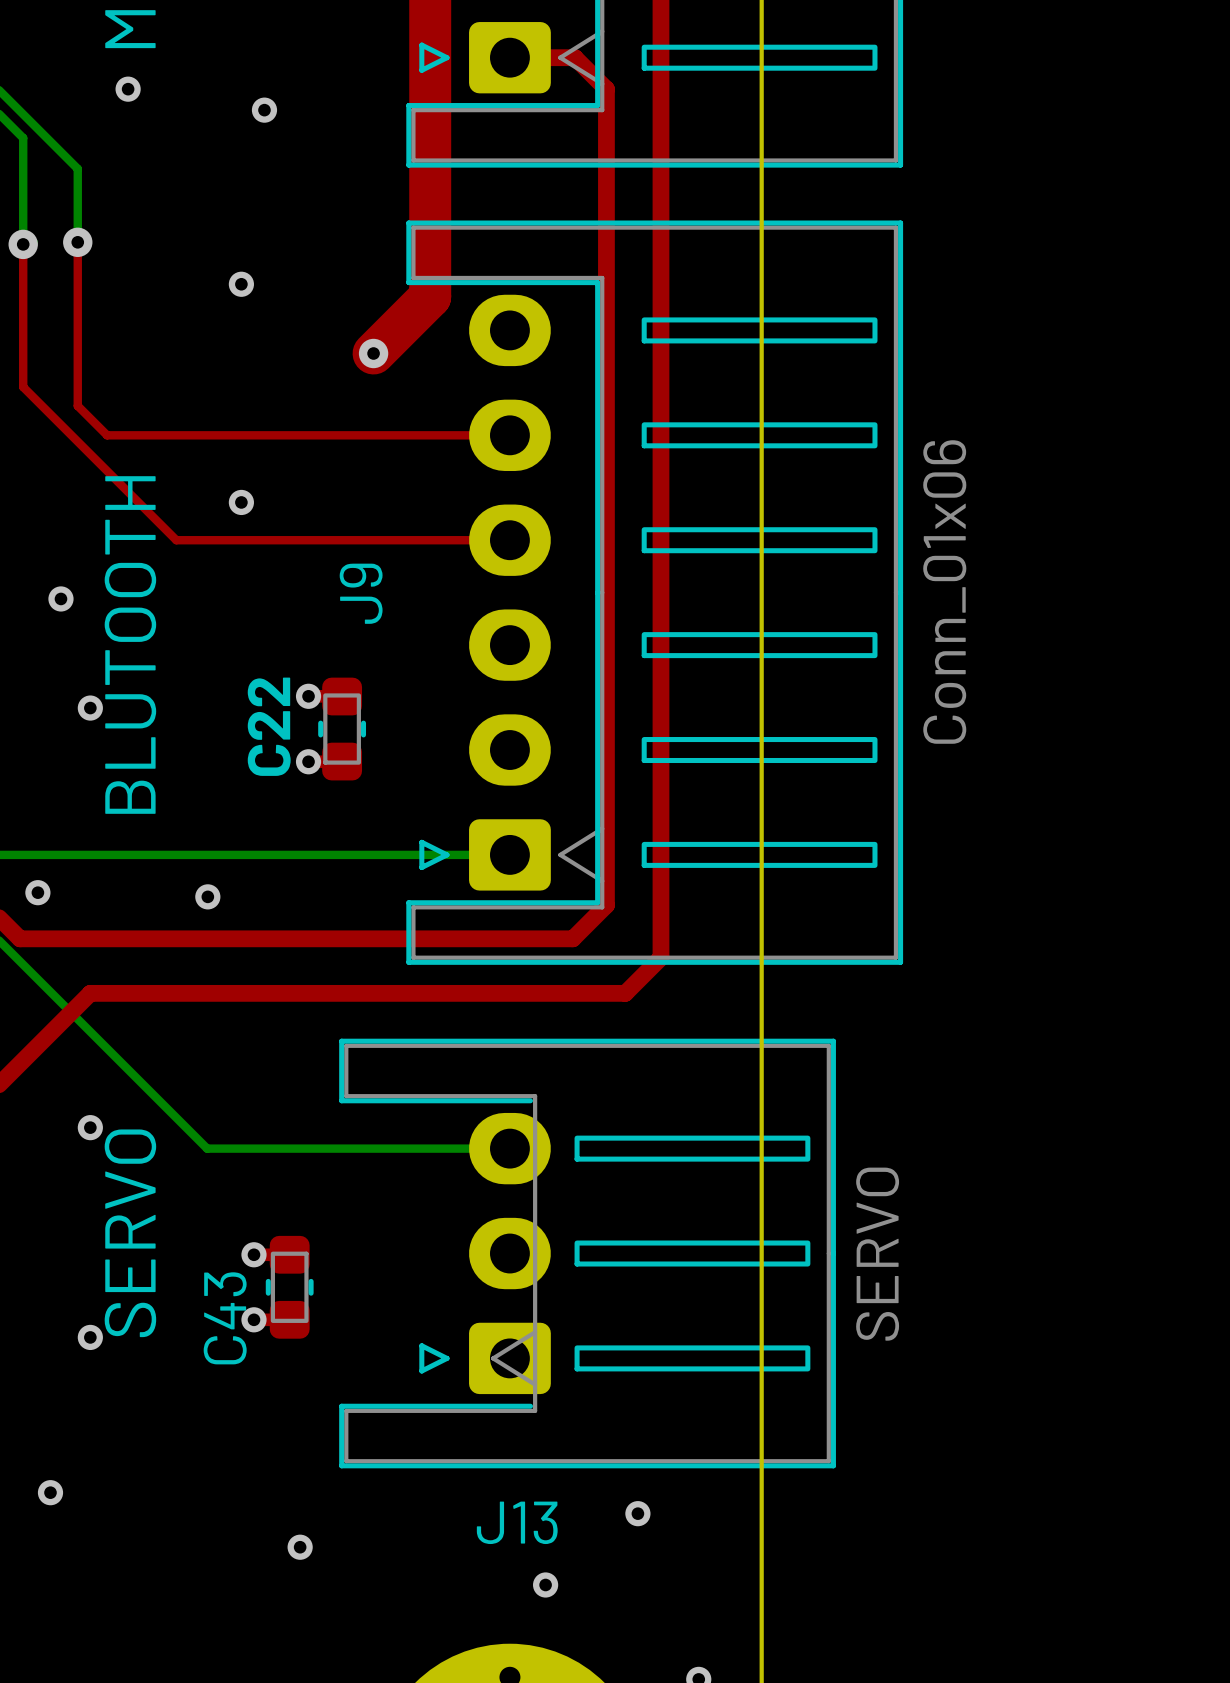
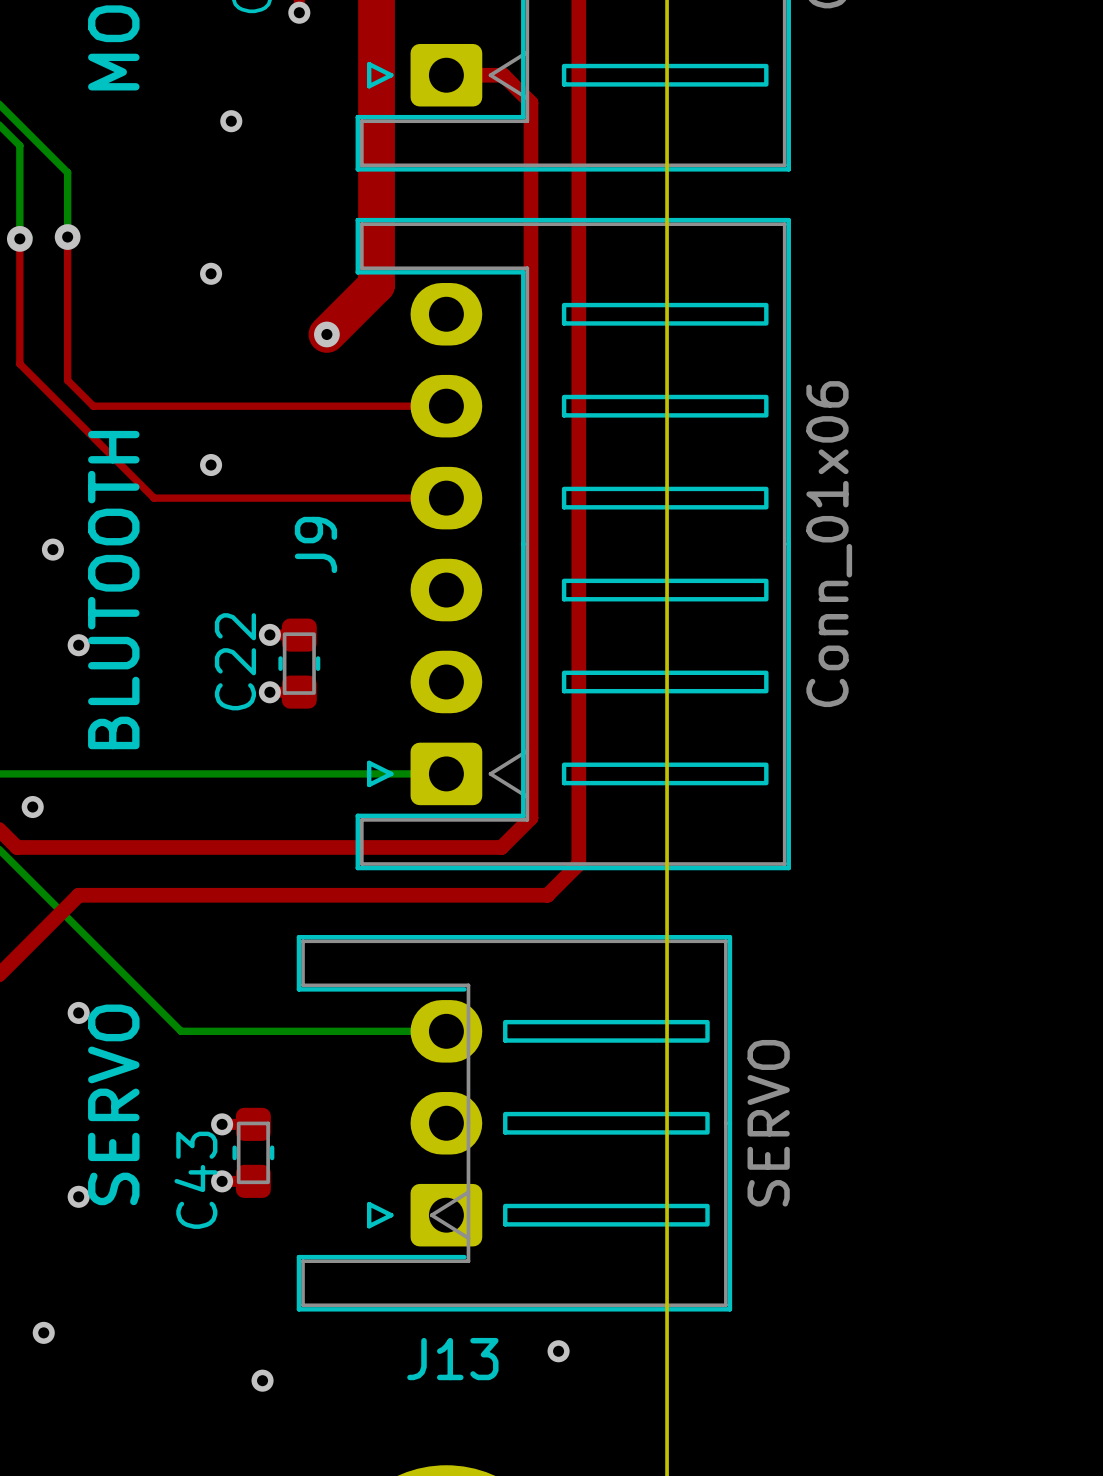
via: (128, 89) -> none
via: (207, 896) -> none
via: (545, 1584) -> none

